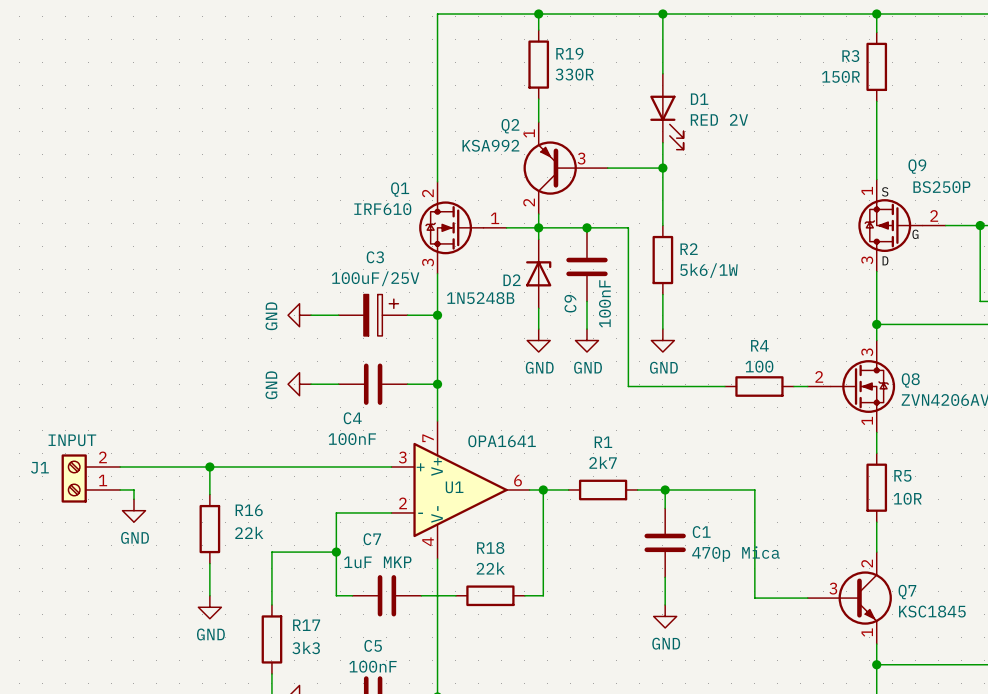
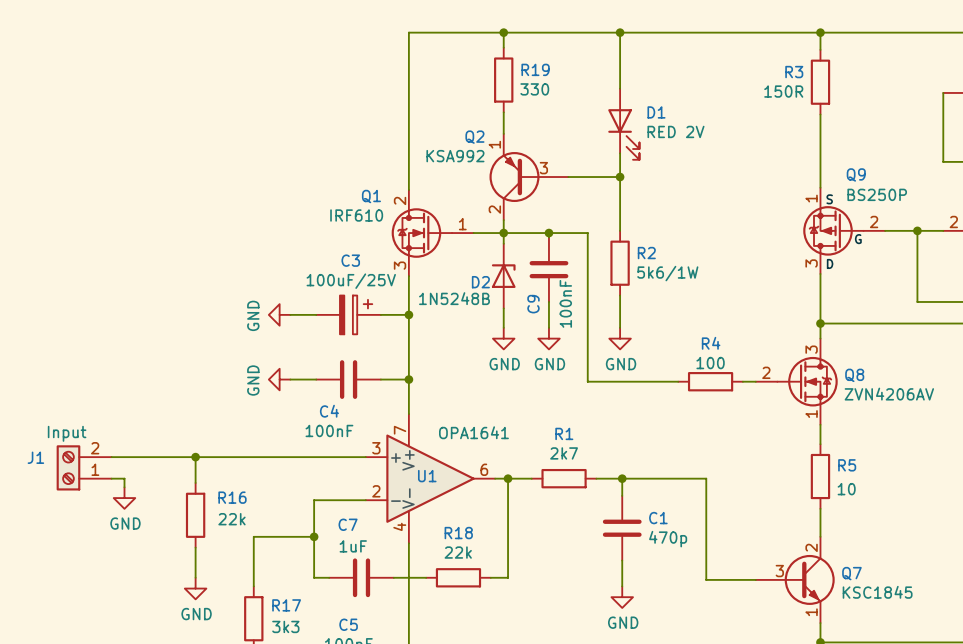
R19 value: 330R (574, 74) -> 330 (534, 89)
J1 value: INPUT (72, 440) -> Input (67, 433)
R5 value: 10R (907, 498) -> 10 (846, 489)
C1 value: 470p Mica (735, 554) -> 470p (668, 539)
C7 value: 1uF MKP (377, 562) -> 1uF (353, 546)

